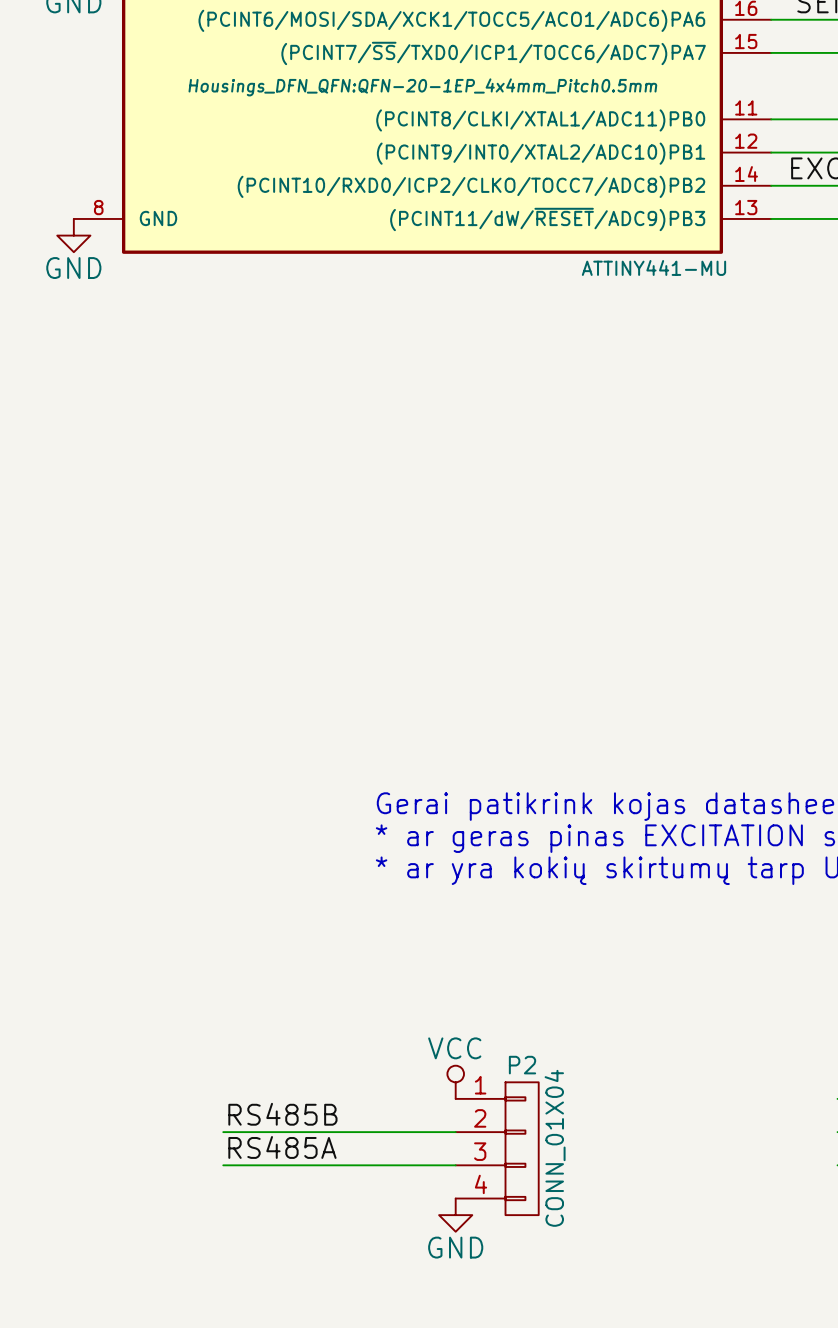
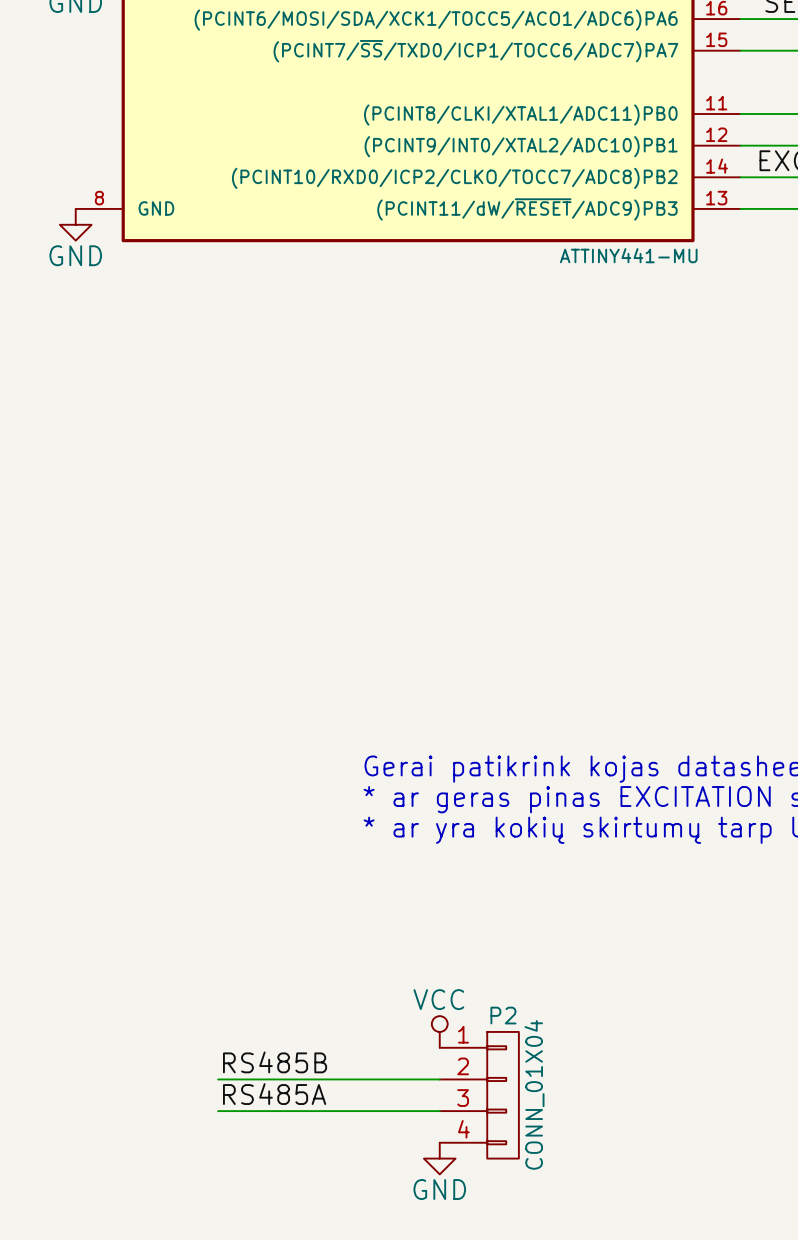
part text: Housings_DFN_QFN:QFN-20-1EP_4x4mm_Pitch0.5mm (422, 87) -> none

